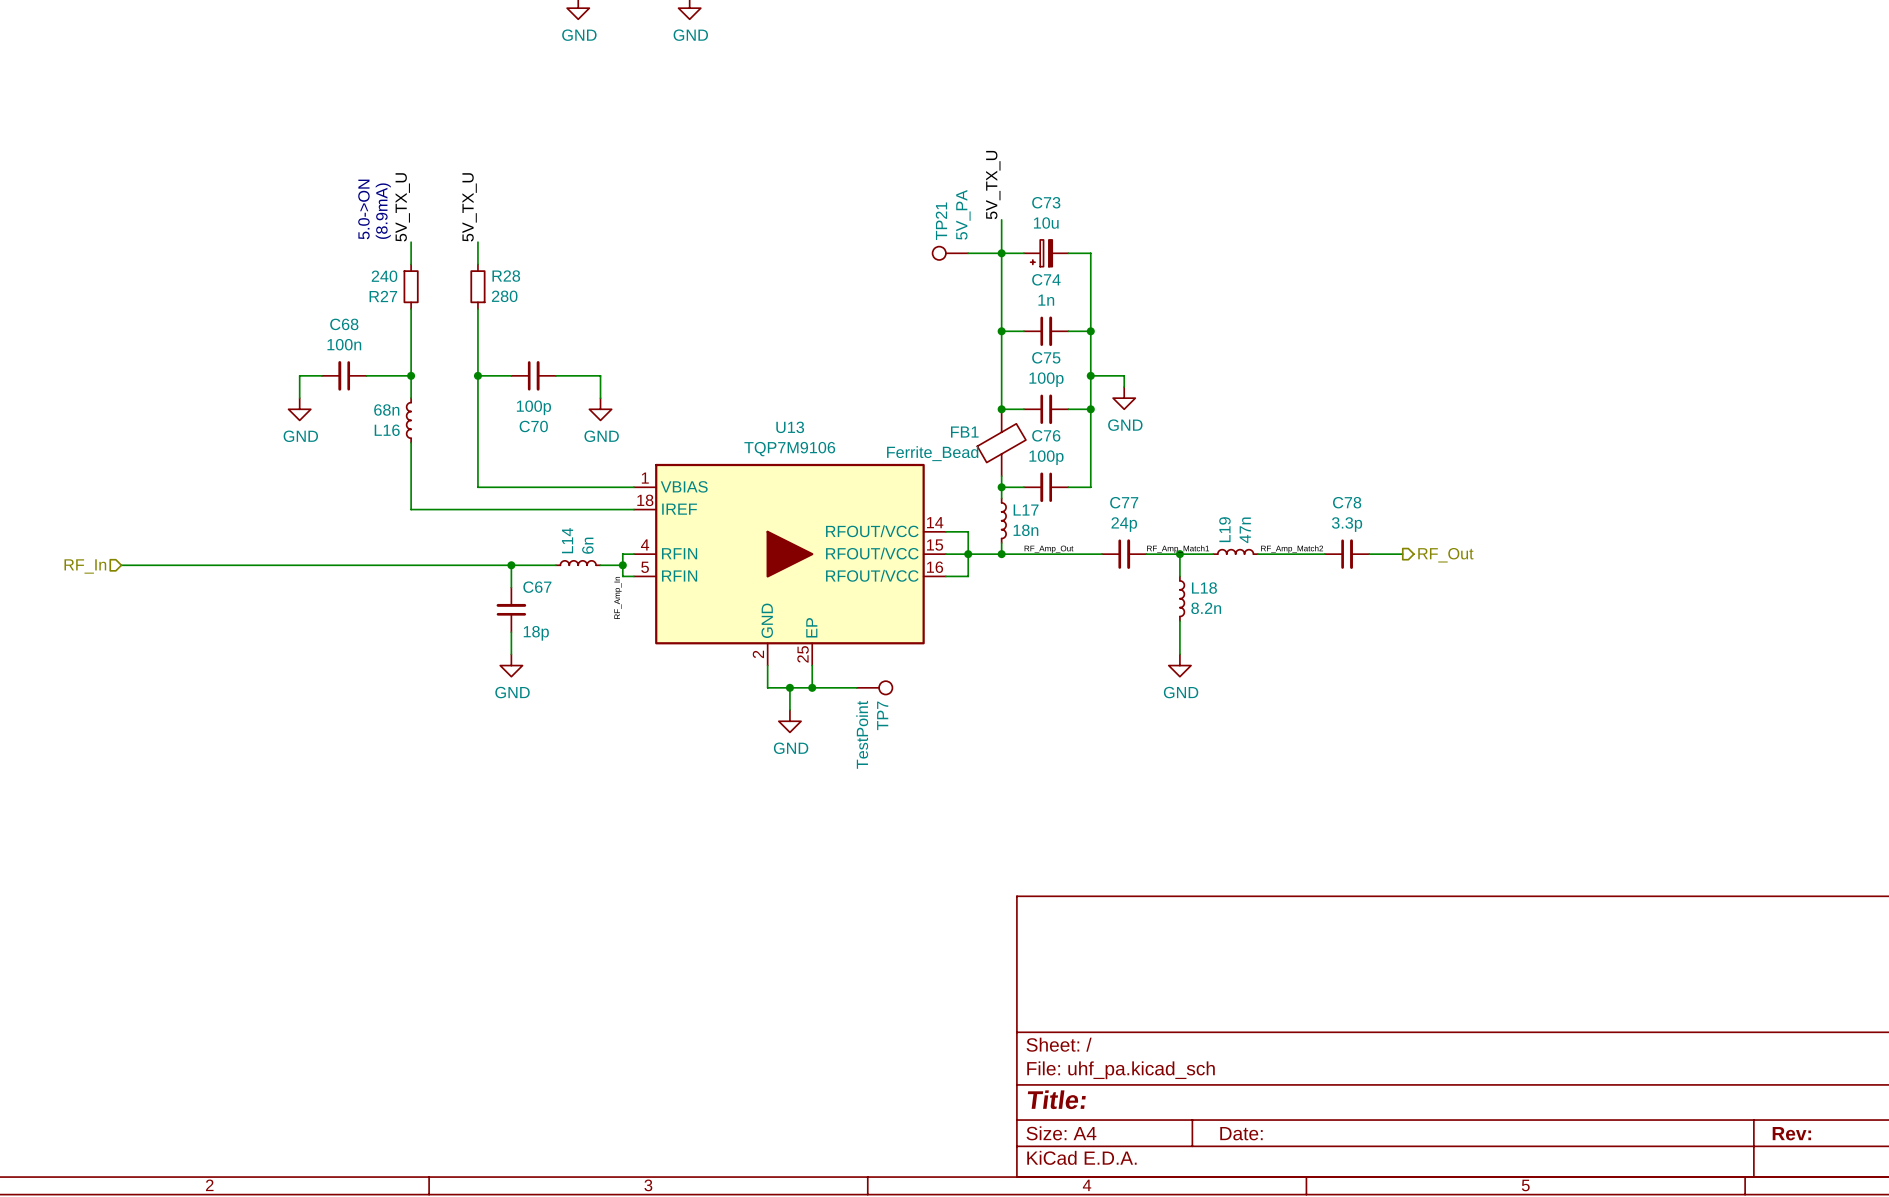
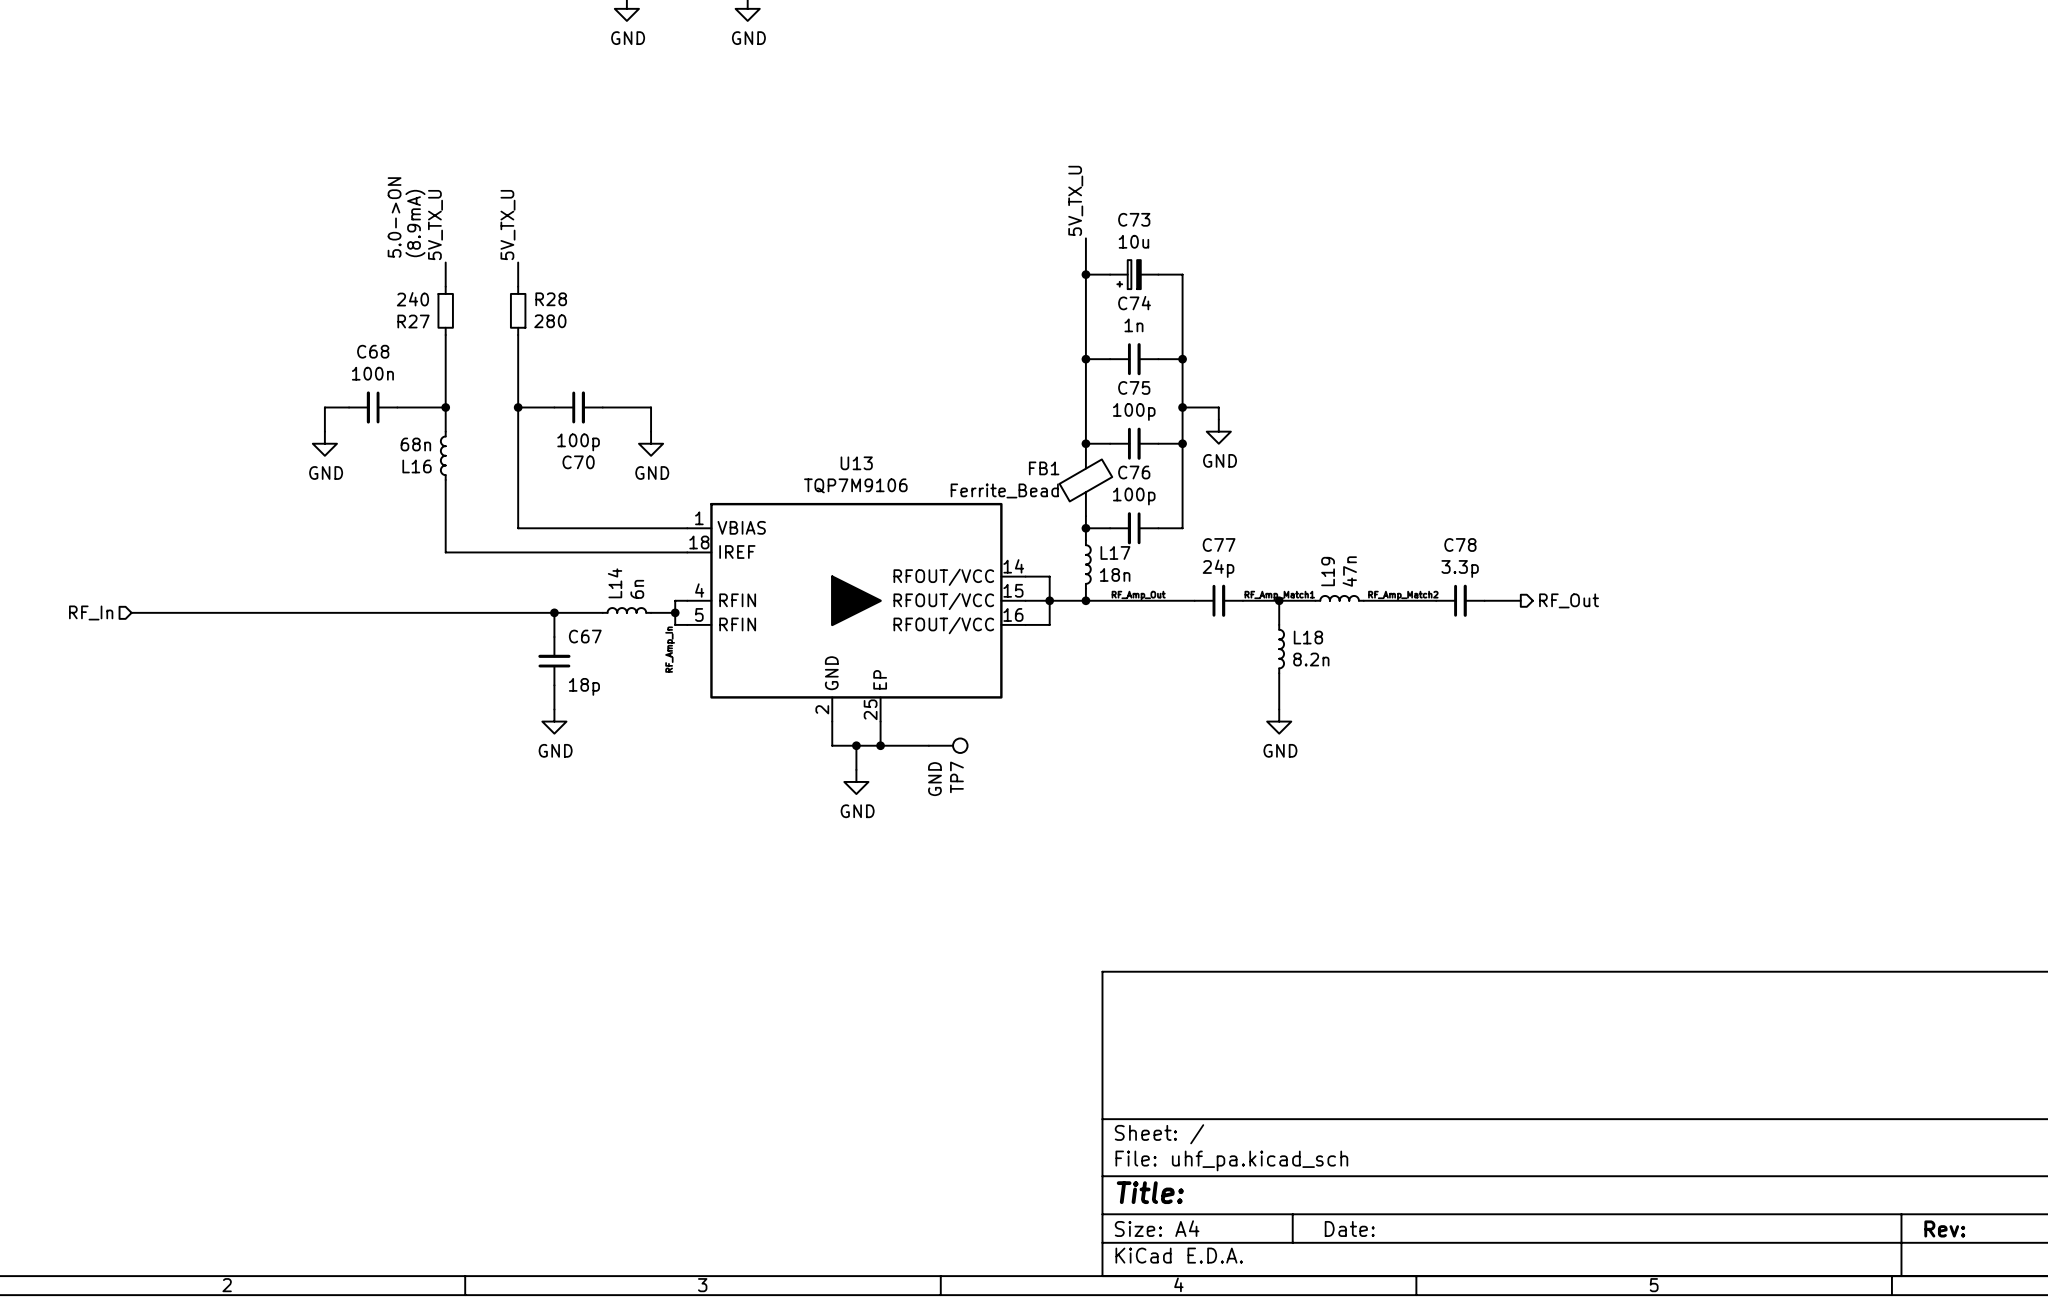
TP21: 5V_PA (950, 253) -> none
wire: (968, 253) (1001, 253) -> none
TP7 value: TestPoint (862, 734) -> GND (934, 779)

